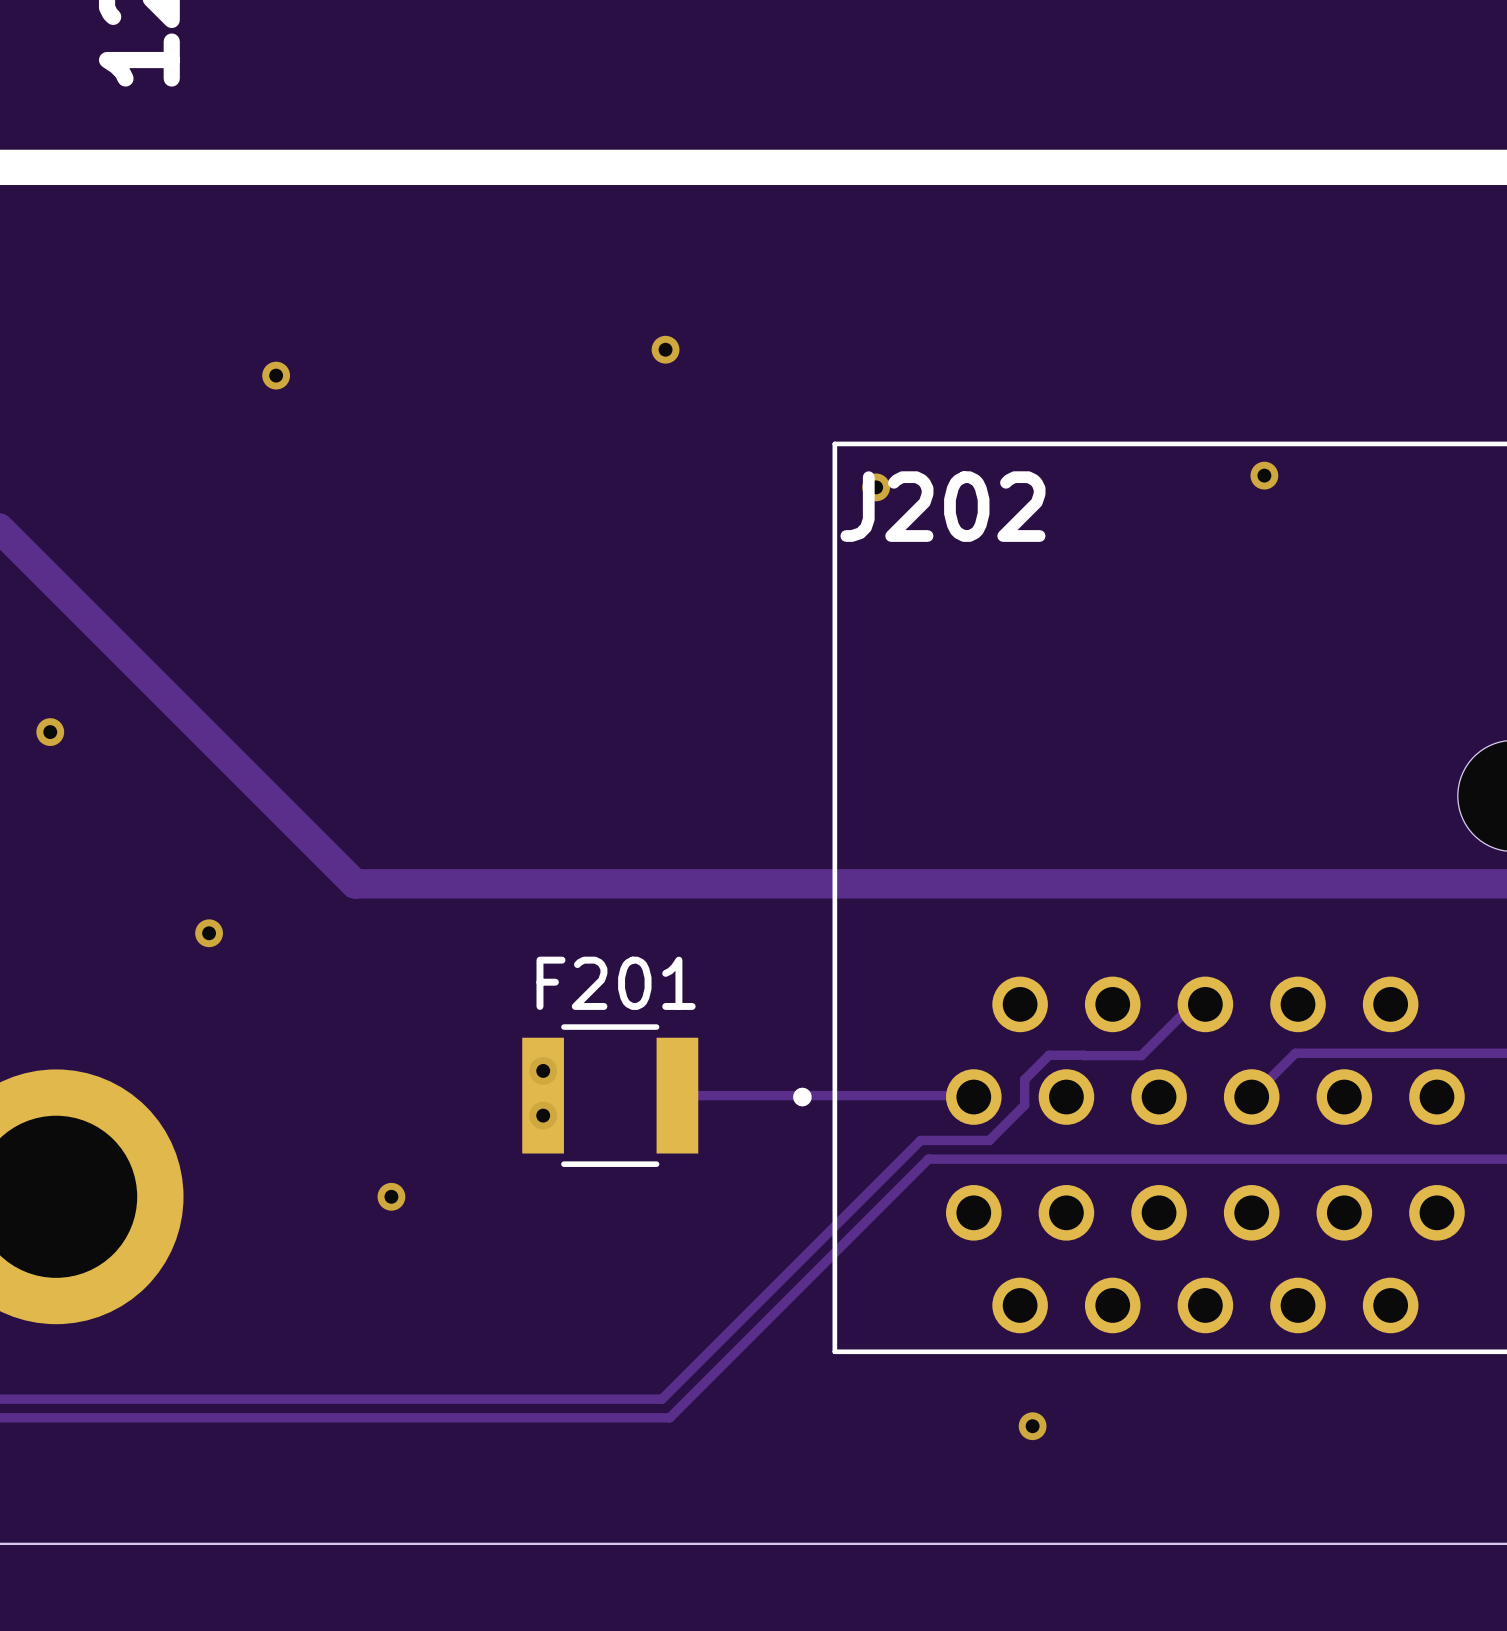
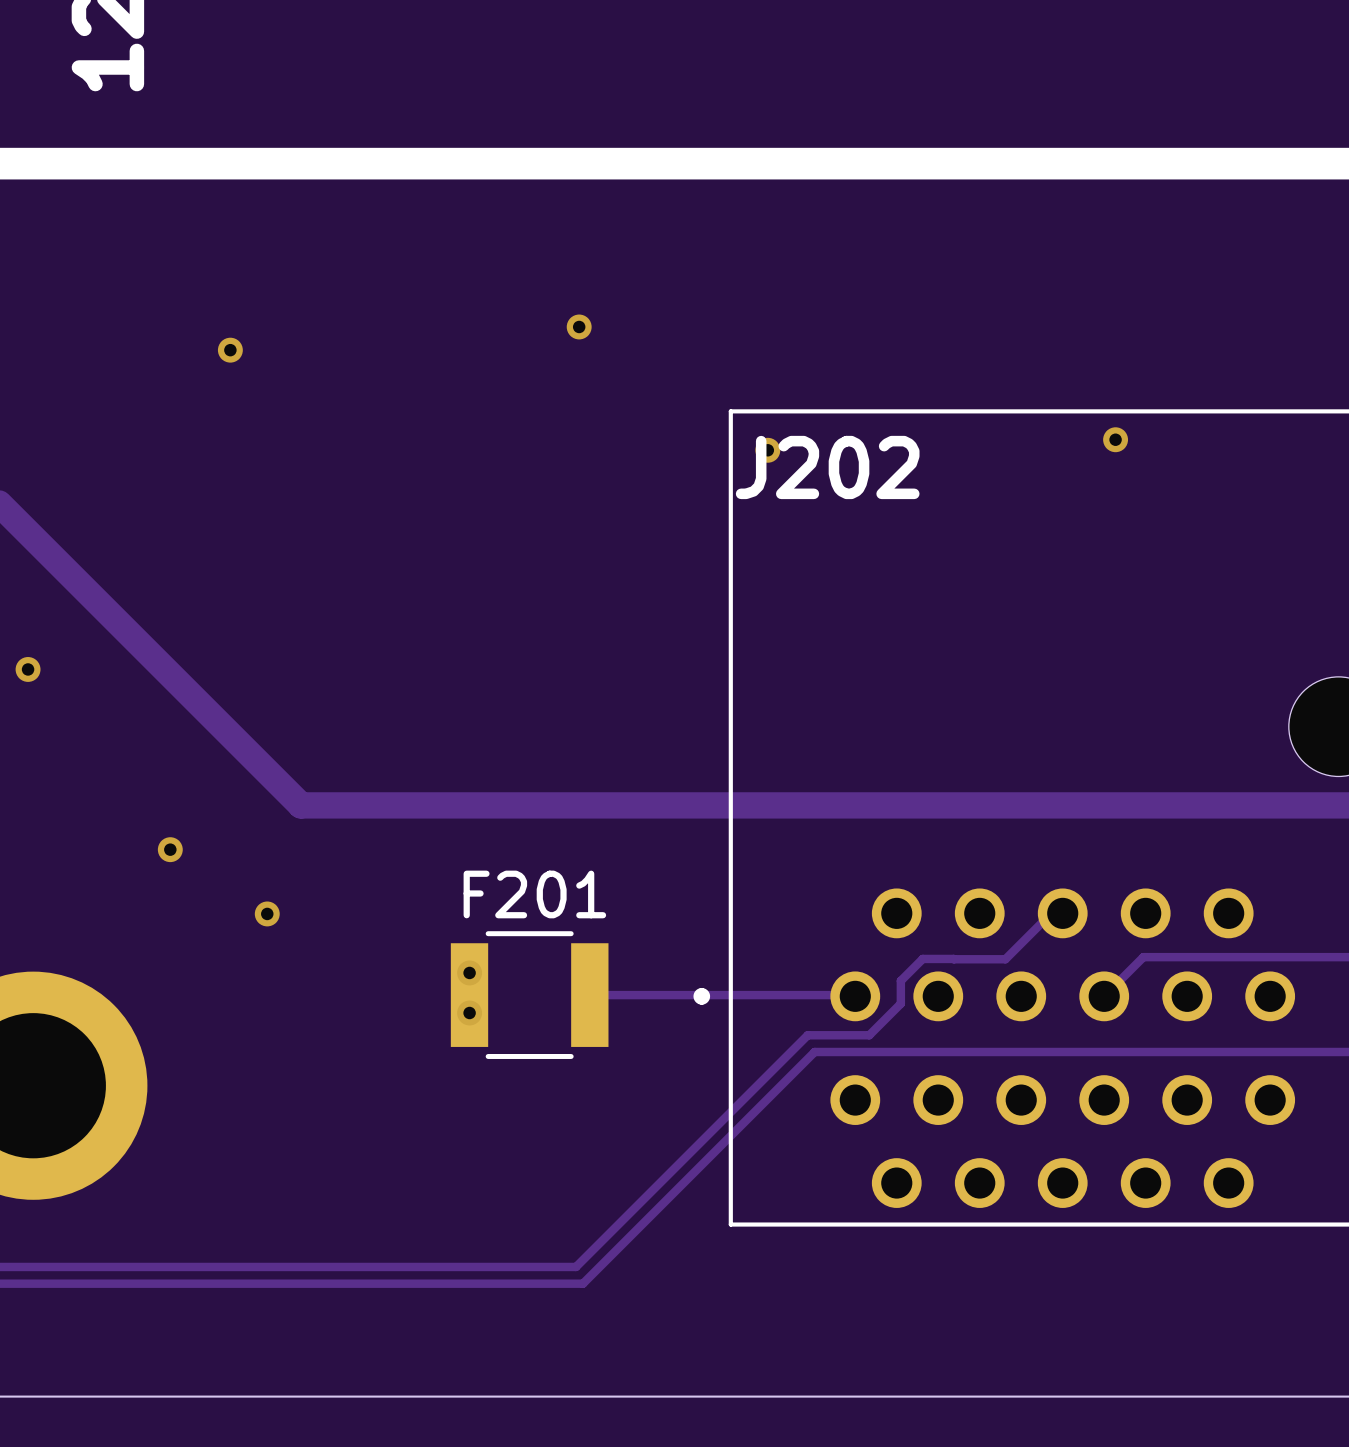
via position: (391, 1196) -> (267, 913)
via: (1032, 1426) -> none

